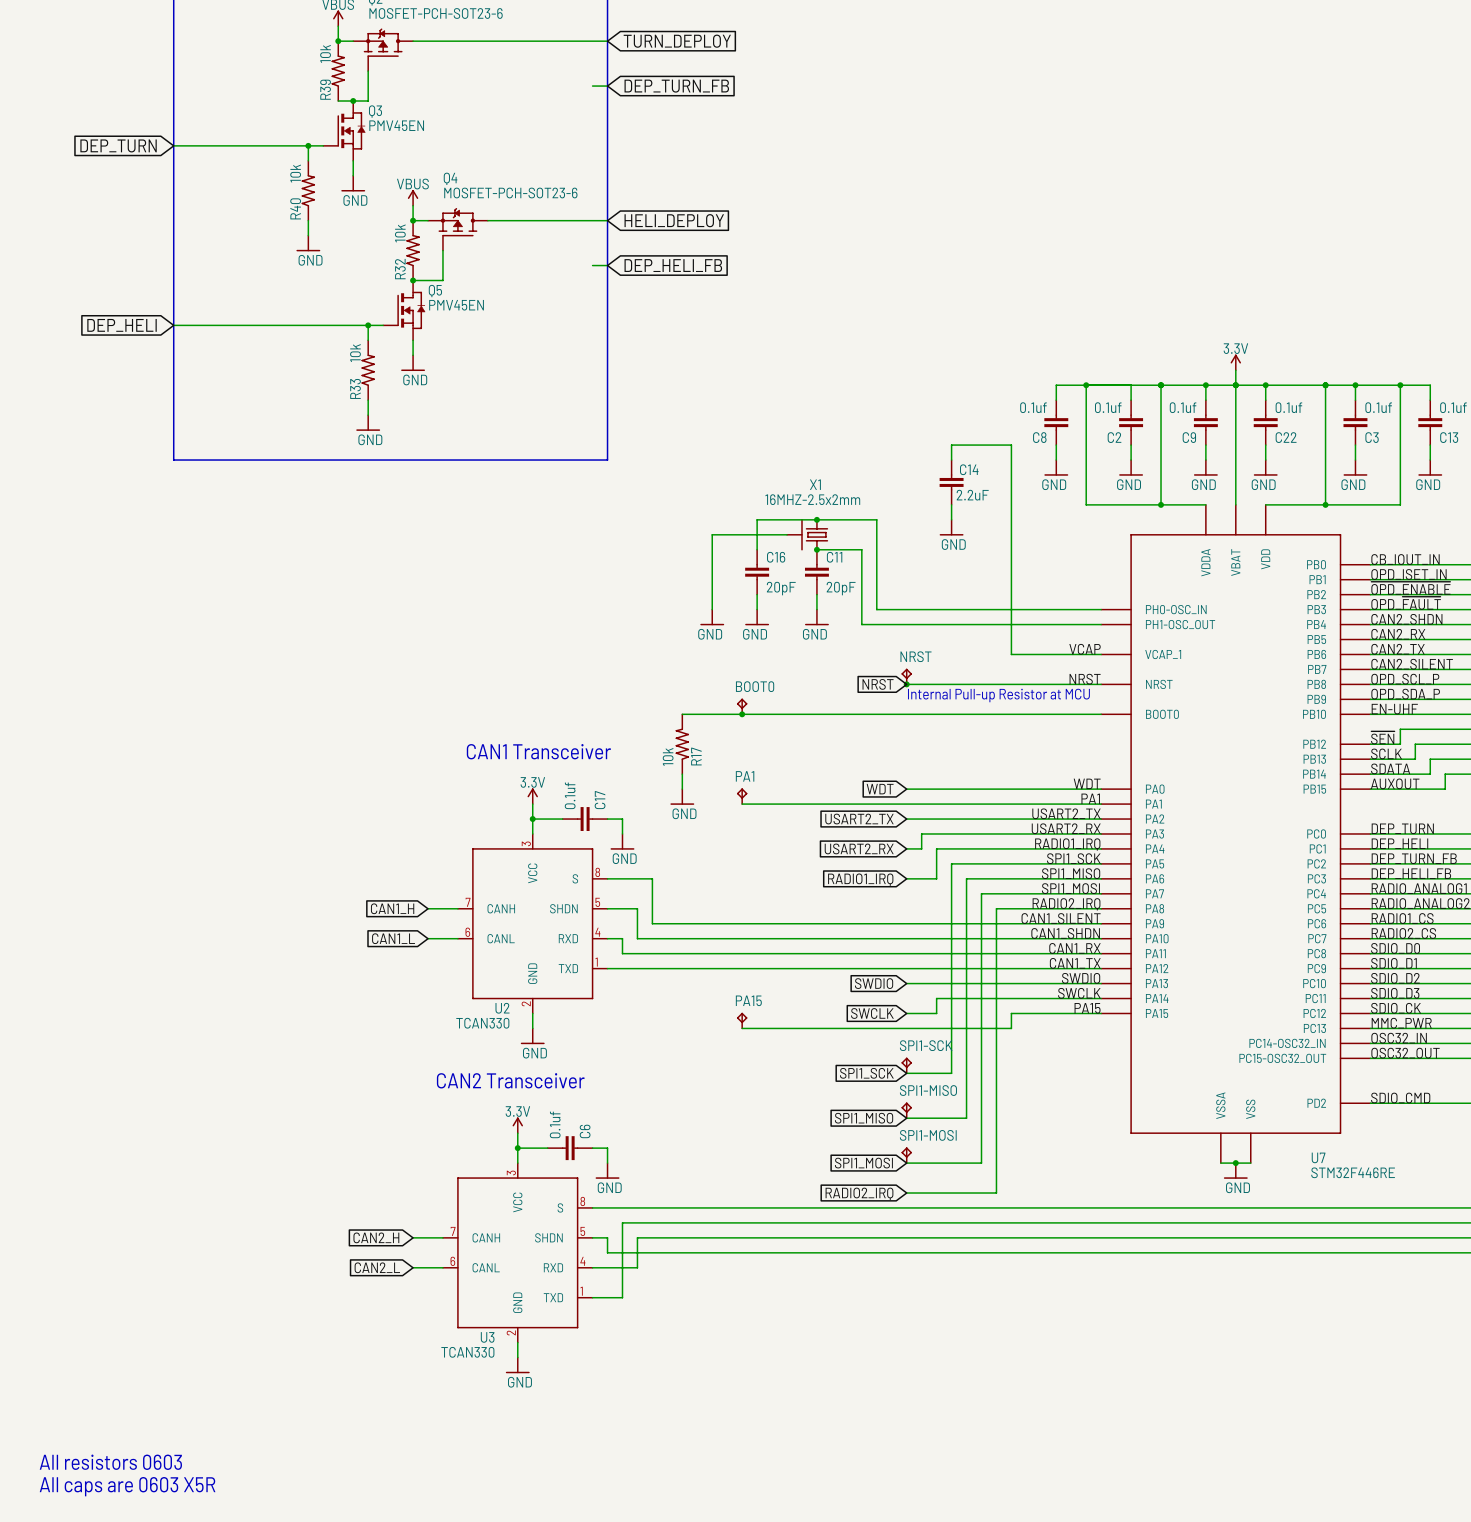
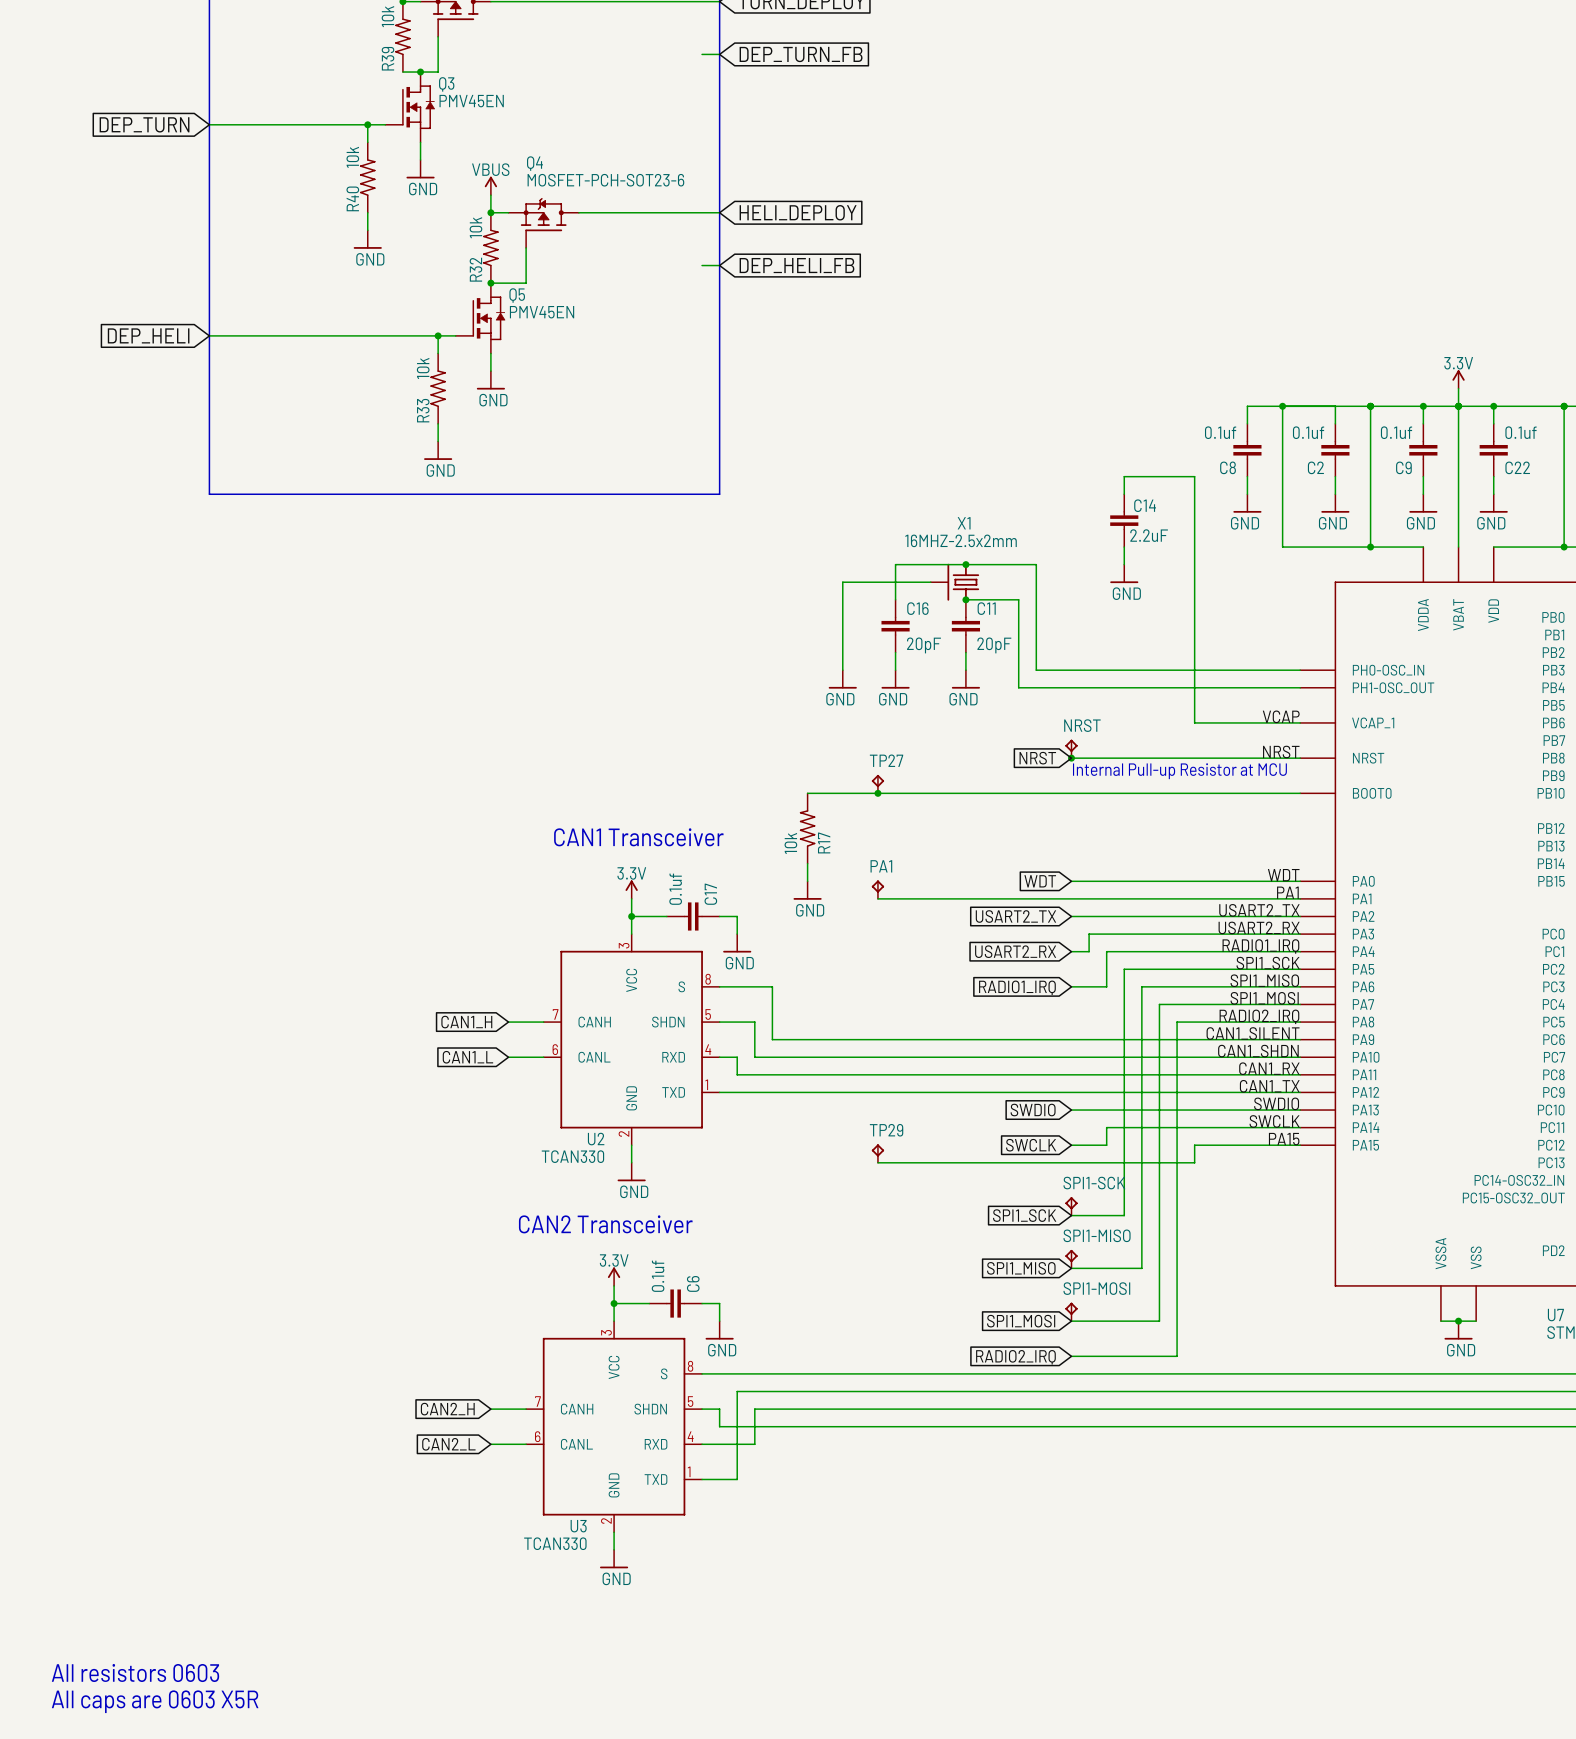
BOOT0 name: BOOT0 (755, 686) -> TP27 (886, 760)
PA15 name: PA15 (748, 1000) -> TP29 (886, 1130)

